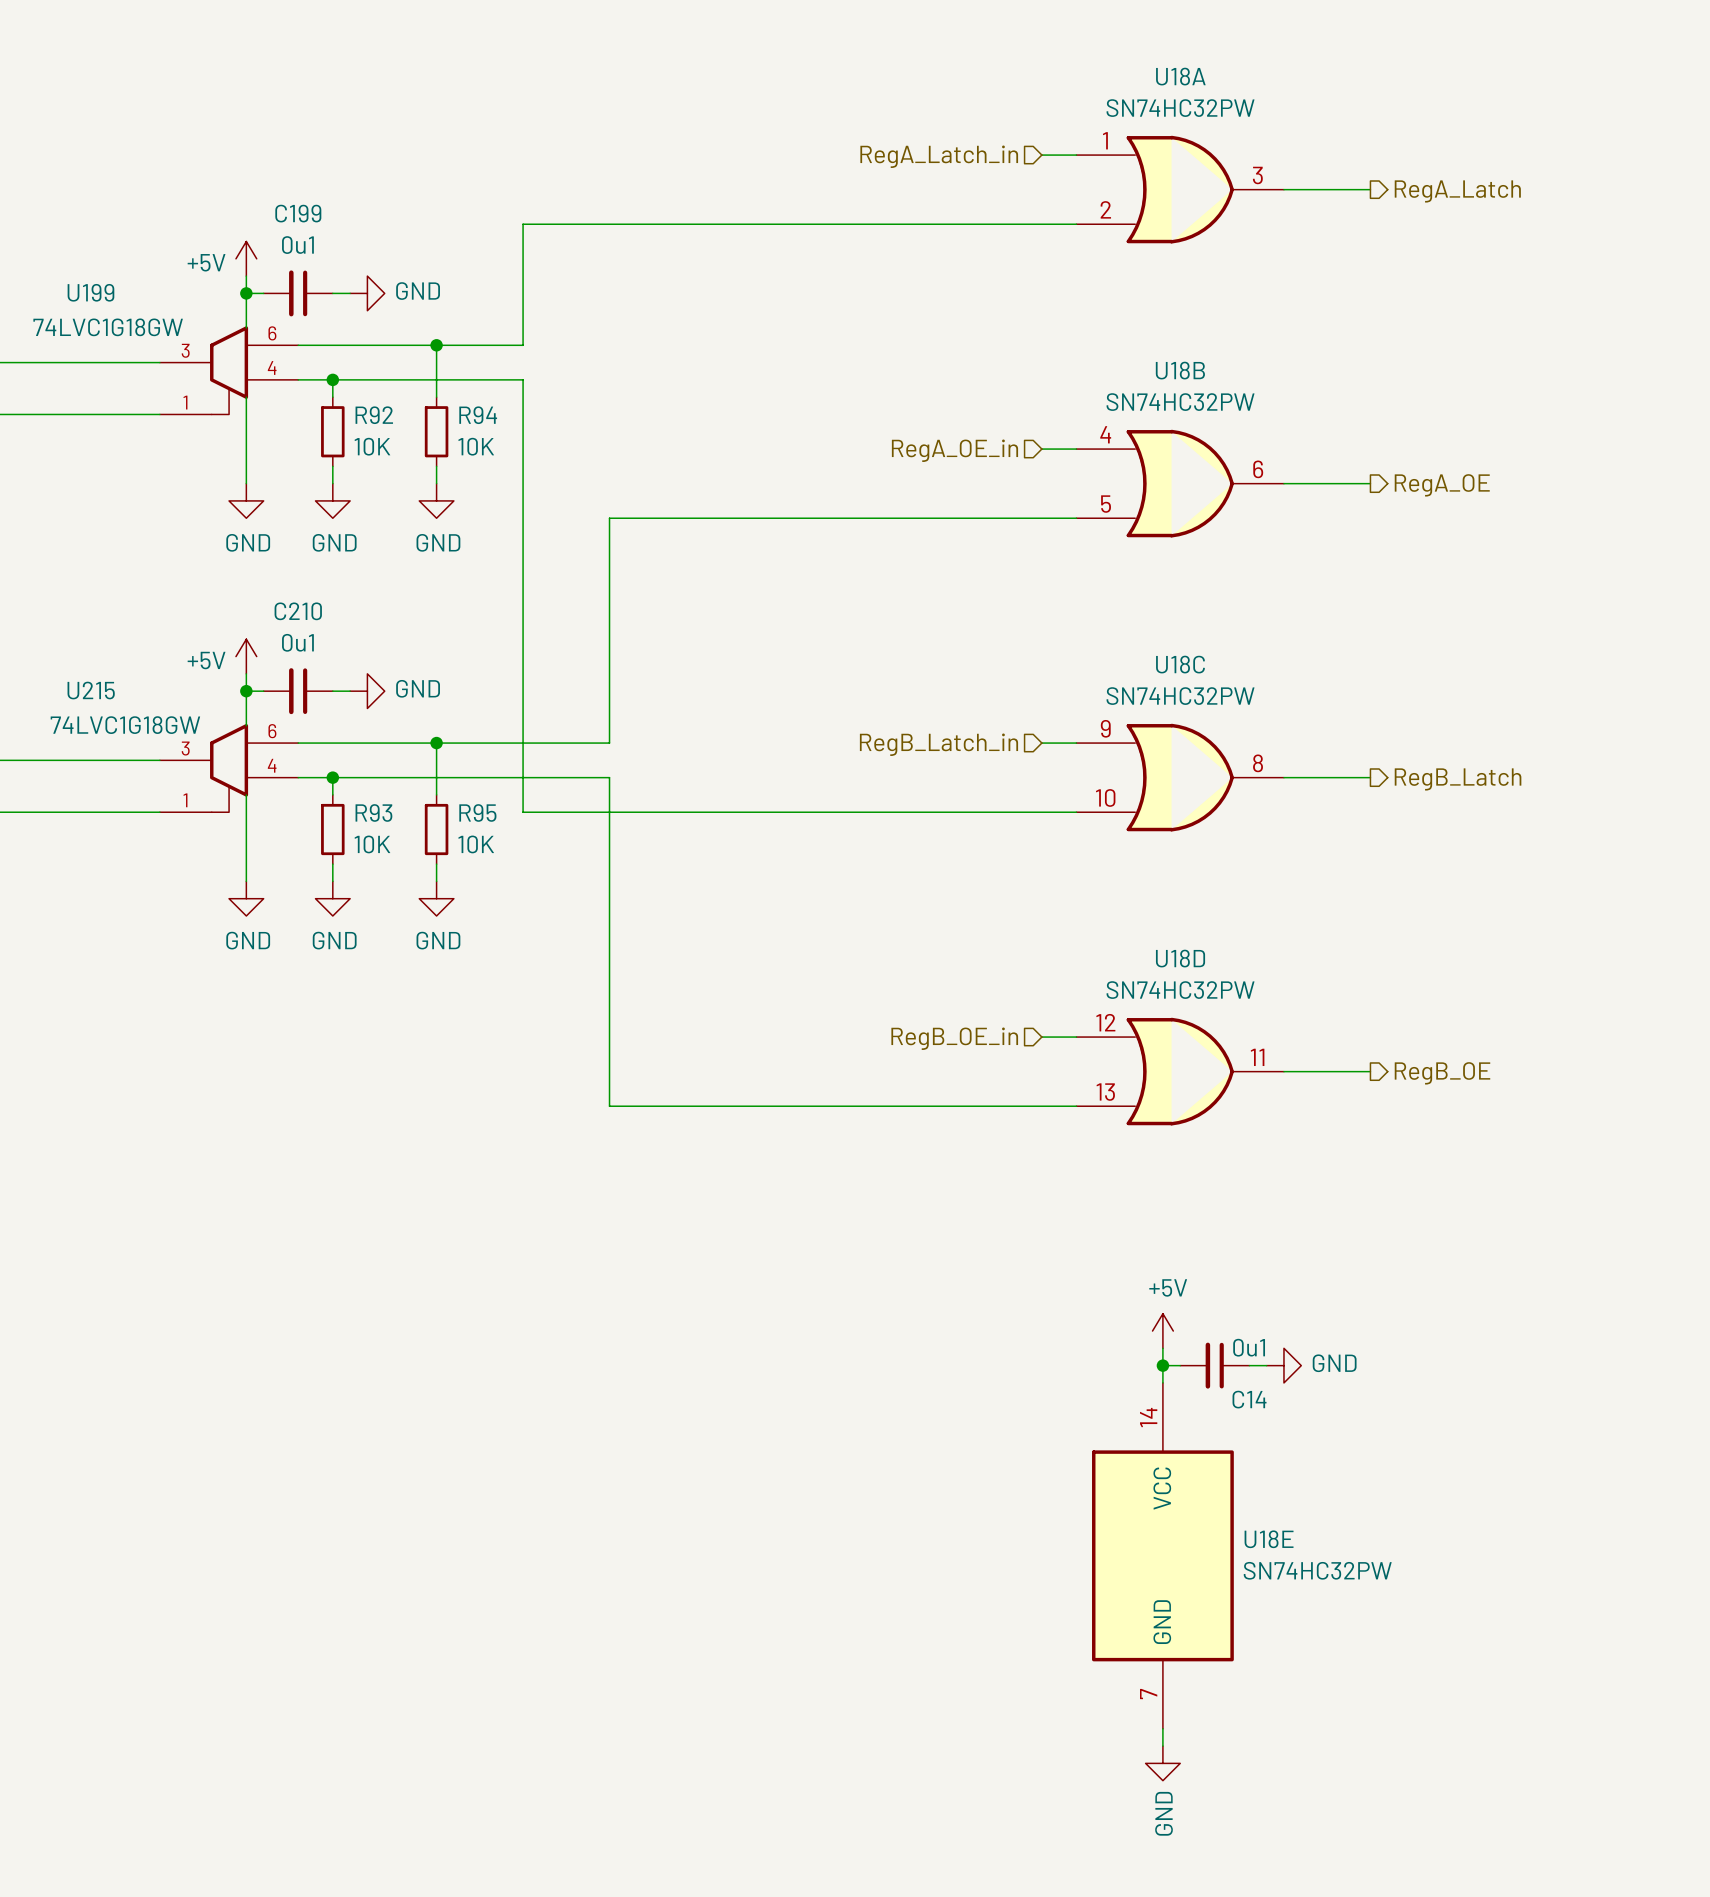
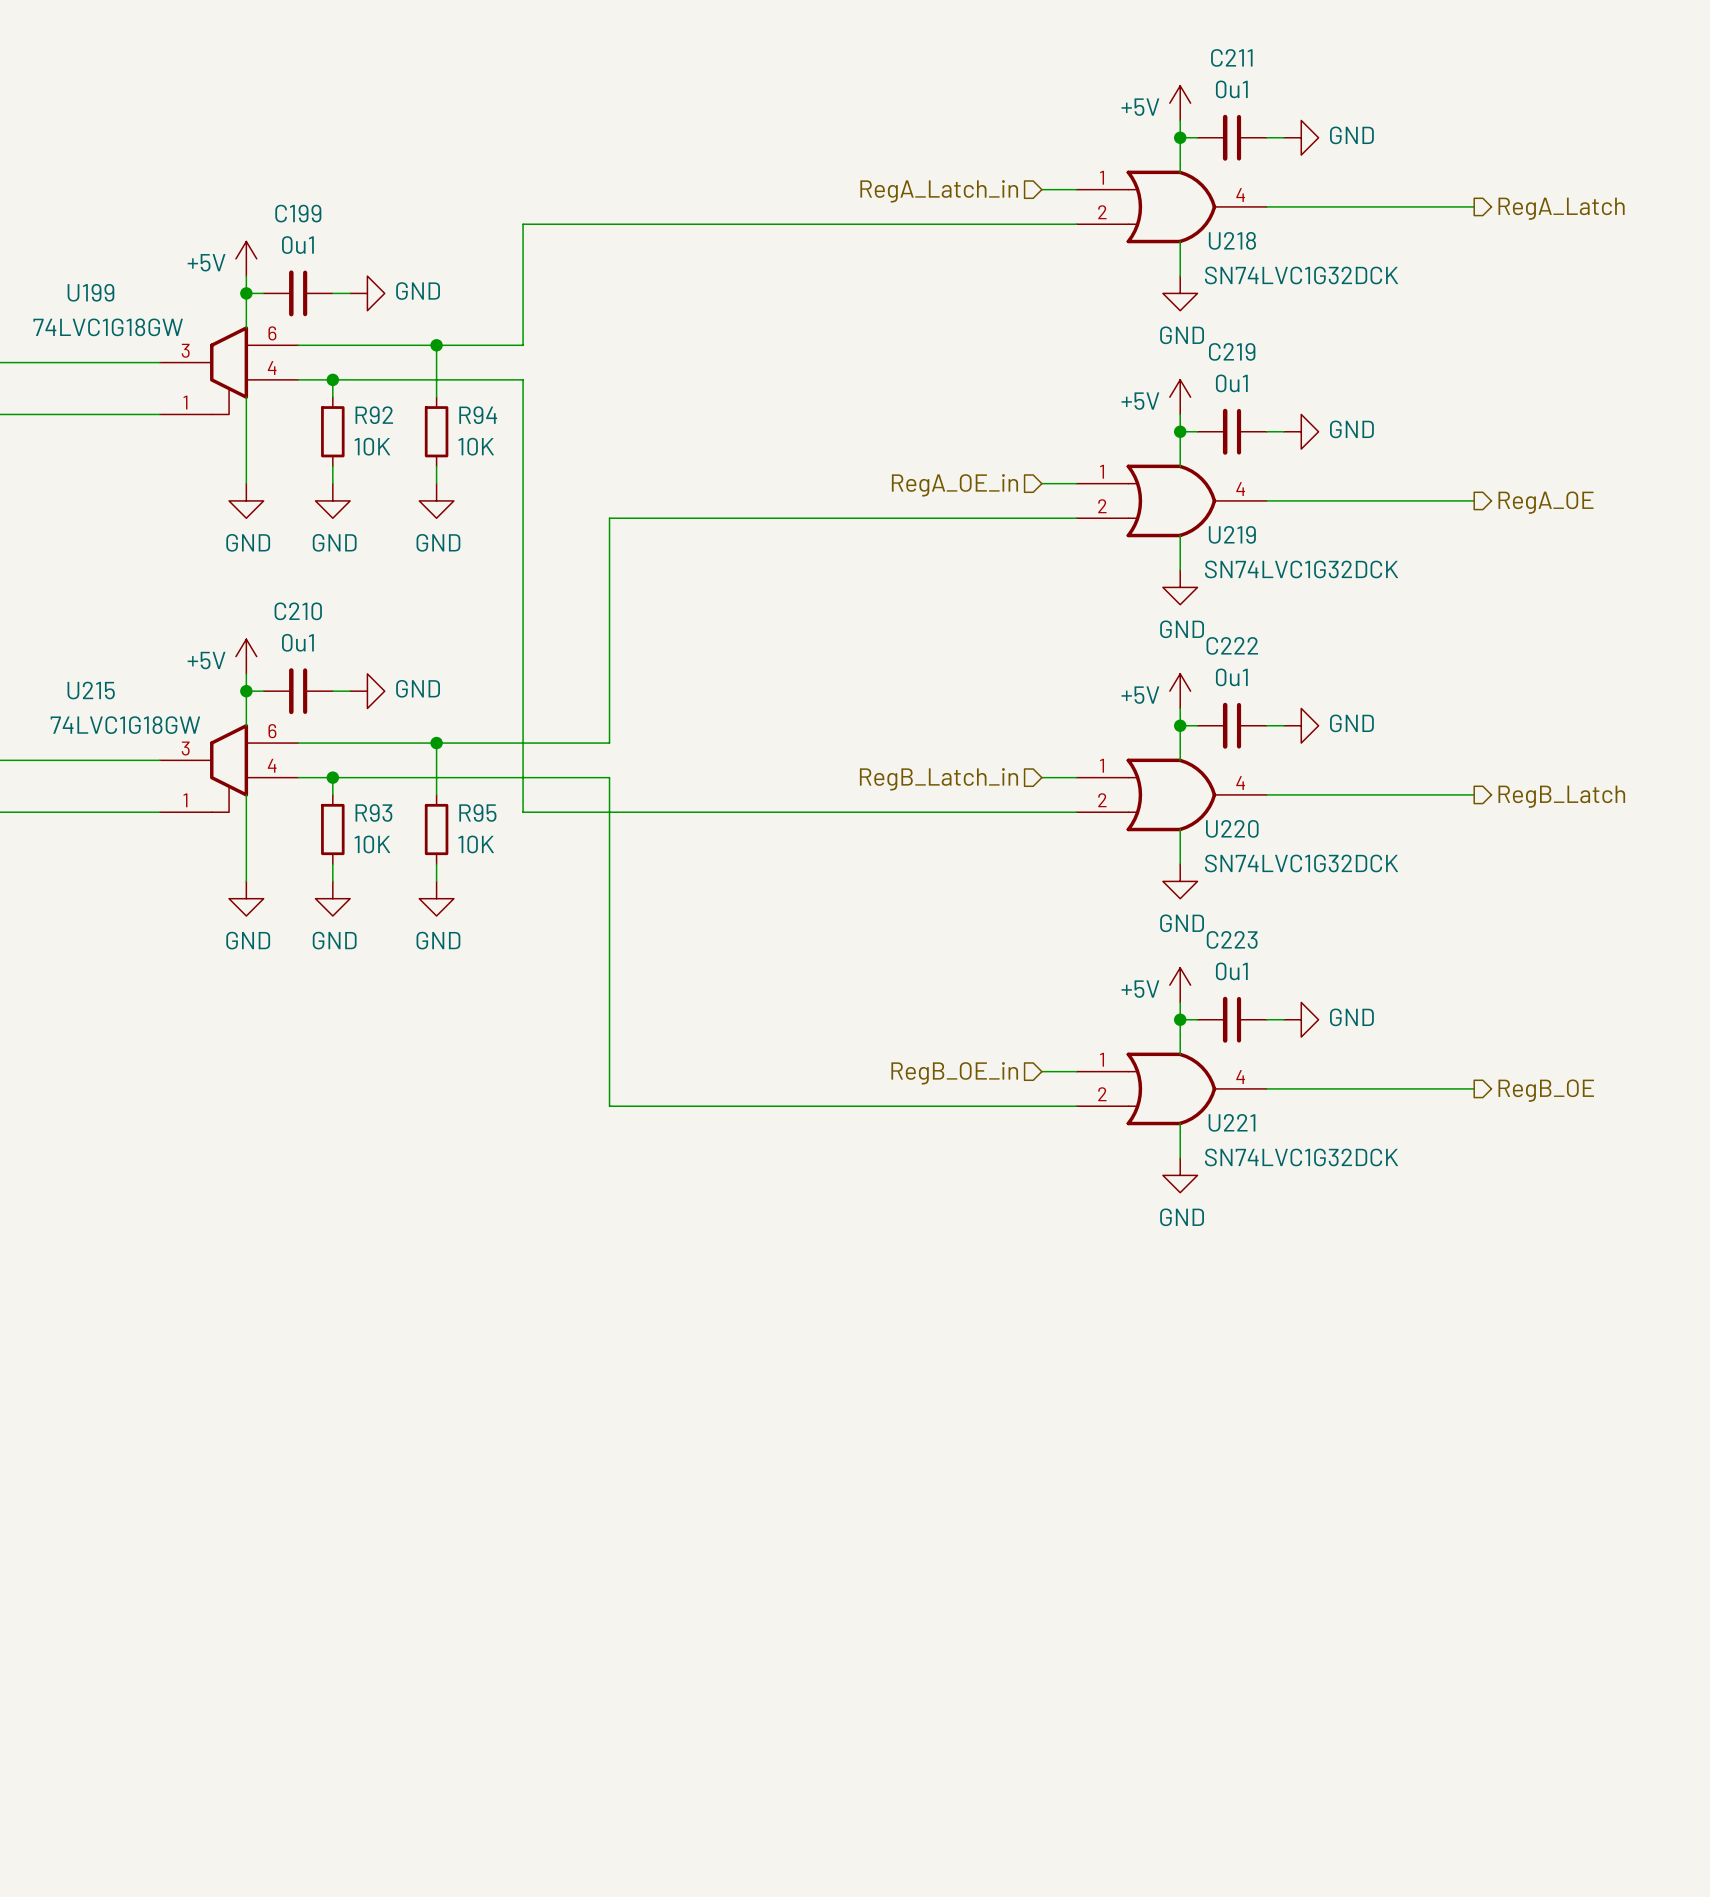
power symbol: none -> +5V (1180, 103)
wire: none -> (1180, 120) (1180, 172)
wire: none -> (1180, 137) (1197, 137)
junction: none -> (1180, 137)
C211: none -> 0u1 (1232, 137)
wire: none -> (1266, 137) (1283, 137)
power symbol: none -> GND (1301, 137)
wire: (1041, 155) (1076, 155) -> (1041, 189) (1076, 189)
hierarchical label position: RegA_Latch_in (939, 156) -> RegA_Latch_in (939, 191)
U18A: SN74HC32PW (1180, 189) -> none
wire: (1283, 189) (1370, 189) -> none
hierarchical label position: RegA_Latch (1457, 191) -> RegA_Latch (1561, 208)
U218: none -> SN74LVC1G32DCK (1171, 206)
wire: none -> (1266, 206) (1474, 206)
wire: none -> (1180, 241) (1180, 276)
power symbol: none -> GND (1180, 293)
power symbol: none -> +5V (1180, 397)
wire: none -> (1180, 414) (1180, 466)
wire: none -> (1180, 431) (1197, 431)
junction: none -> (1180, 431)
C219: none -> 0u1 (1232, 431)
wire: none -> (1266, 431) (1283, 431)
power symbol: none -> GND (1301, 431)
wire: (1041, 449) (1076, 449) -> (1041, 483) (1076, 483)
hierarchical label position: RegA_OE_in (954, 450) -> RegA_OE_in (954, 485)
U18B: SN74HC32PW (1180, 483) -> none
wire: (1283, 483) (1370, 483) -> none
hierarchical label position: RegA_OE (1442, 485) -> RegA_OE (1546, 502)
U219: none -> SN74LVC1G32DCK (1171, 500)
wire: none -> (1266, 500) (1474, 500)
wire: none -> (1180, 535) (1180, 570)
power symbol: none -> GND (1180, 587)
power symbol: none -> +5V (1180, 691)
wire: none -> (1180, 708) (1180, 760)
wire: none -> (1180, 725) (1197, 725)
junction: none -> (1180, 725)
C222: none -> 0u1 (1232, 725)
wire: none -> (1266, 725) (1283, 725)
power symbol: none -> GND (1301, 725)
wire: (1041, 743) (1076, 743) -> (1041, 777) (1076, 777)
hierarchical label position: RegB_Latch_in (938, 744) -> RegB_Latch_in (938, 779)
U18C: SN74HC32PW (1180, 777) -> none
wire: (1283, 777) (1370, 777) -> none
hierarchical label position: RegB_Latch (1458, 779) -> RegB_Latch (1561, 796)
U220: none -> SN74LVC1G32DCK (1171, 794)
wire: none -> (1266, 794) (1474, 794)
wire: none -> (1180, 829) (1180, 864)
power symbol: none -> GND (1180, 881)
power symbol: none -> +5V (1180, 985)
wire: none -> (1180, 1002) (1180, 1054)
wire: none -> (1180, 1019) (1197, 1019)
junction: none -> (1180, 1019)
C223: none -> 0u1 (1232, 1019)
wire: none -> (1266, 1019) (1283, 1019)
power symbol: none -> GND (1301, 1019)
wire: (1041, 1037) (1076, 1037) -> (1041, 1071) (1076, 1071)
hierarchical label position: RegB_OE_in (954, 1038) -> RegB_OE_in (954, 1073)
U18D: SN74HC32PW (1180, 1071) -> none
wire: (1283, 1071) (1370, 1071) -> none
hierarchical label position: RegB_OE (1442, 1073) -> RegB_OE (1546, 1090)
U221: none -> SN74LVC1G32DCK (1171, 1088)
wire: none -> (1266, 1088) (1474, 1088)
power symbol: none -> GND (1180, 1175)
power symbol: +5V (1162, 1331) -> none
wire: (1162, 1348) (1162, 1382) -> (1180, 1123) (1180, 1158)
wire: (1162, 1365) (1180, 1365) -> none
junction: (1162, 1365) -> none
C14: 0u1 (1214, 1365) -> none
wire: (1249, 1365) (1266, 1365) -> none
power symbol: GND (1283, 1365) -> none
U18E: SN74HC32PW (1162, 1555) -> none
wire: (1162, 1728) (1162, 1746) -> none
power symbol: GND (1162, 1763) -> none

